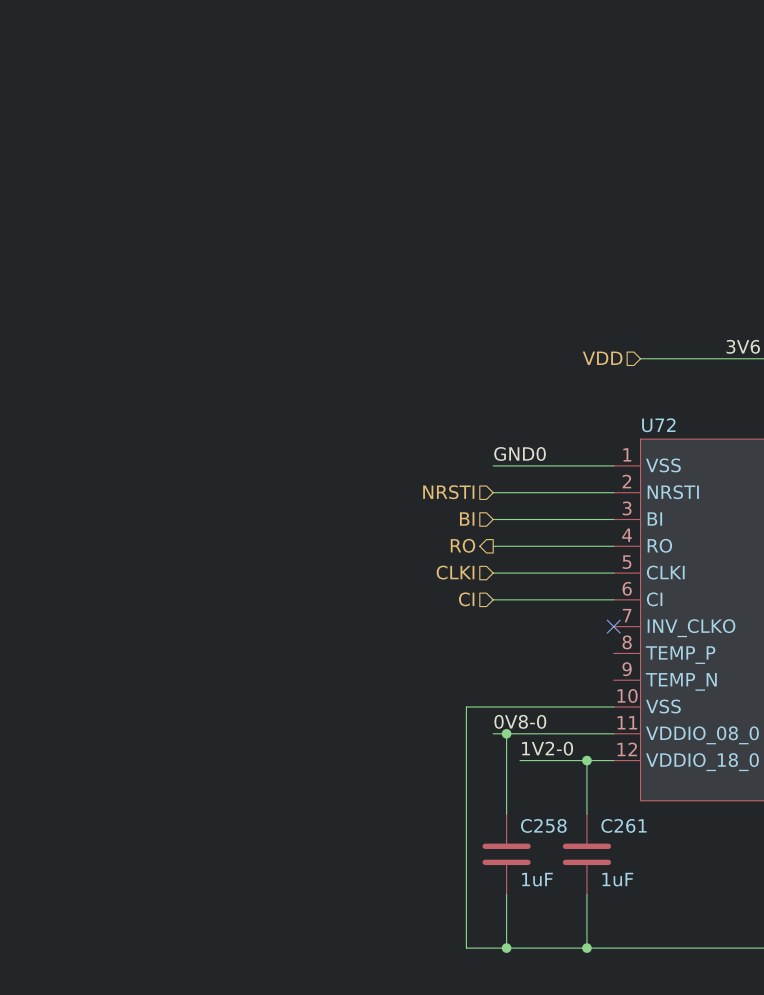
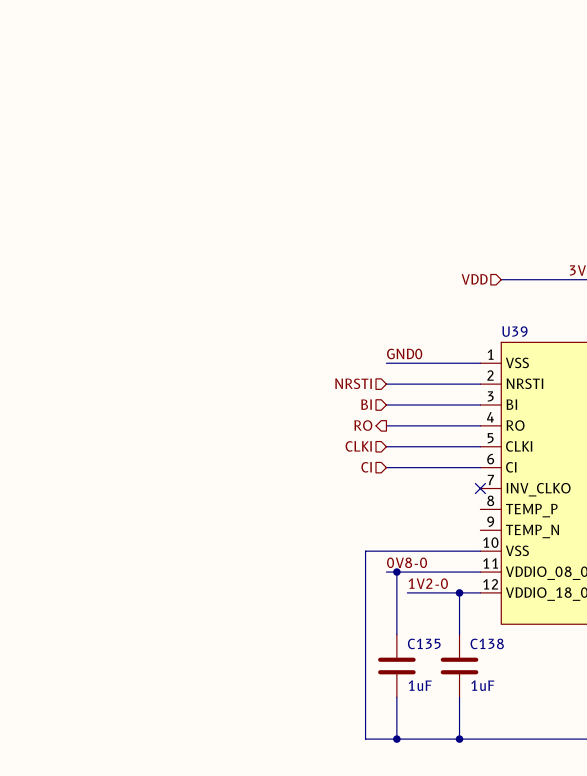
U72 name: U72 (658, 425) -> U39 (514, 331)
C258 name: C258 (543, 825) -> C135 (424, 643)
C261 name: C261 (623, 825) -> C138 (487, 643)

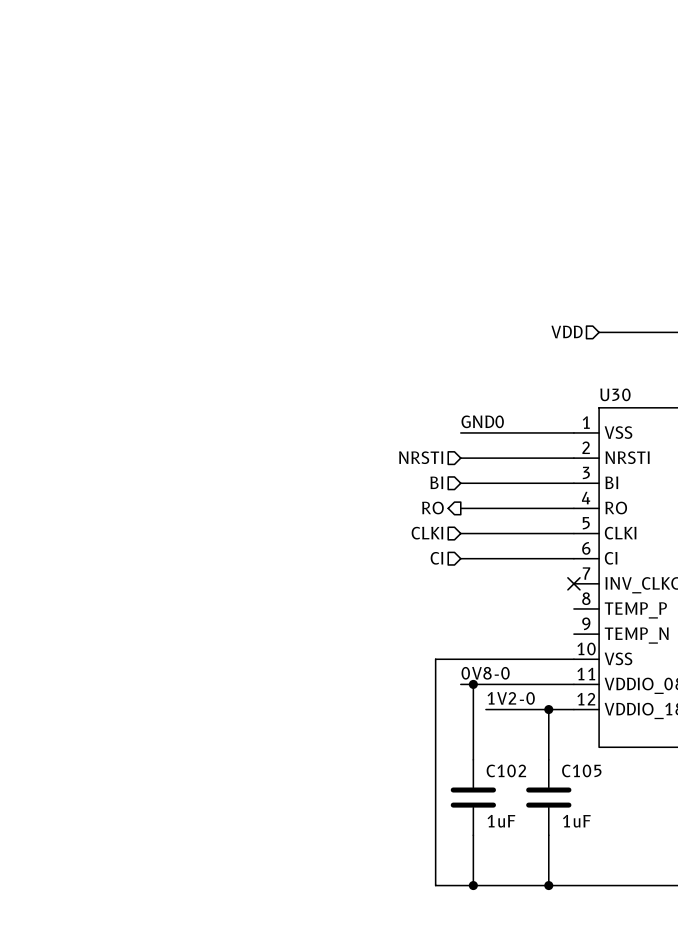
U39 name: U39 (514, 331) -> U30 (615, 394)
C135 name: C135 (424, 643) -> C102 (506, 770)
C138 name: C138 (487, 643) -> C105 (581, 770)

